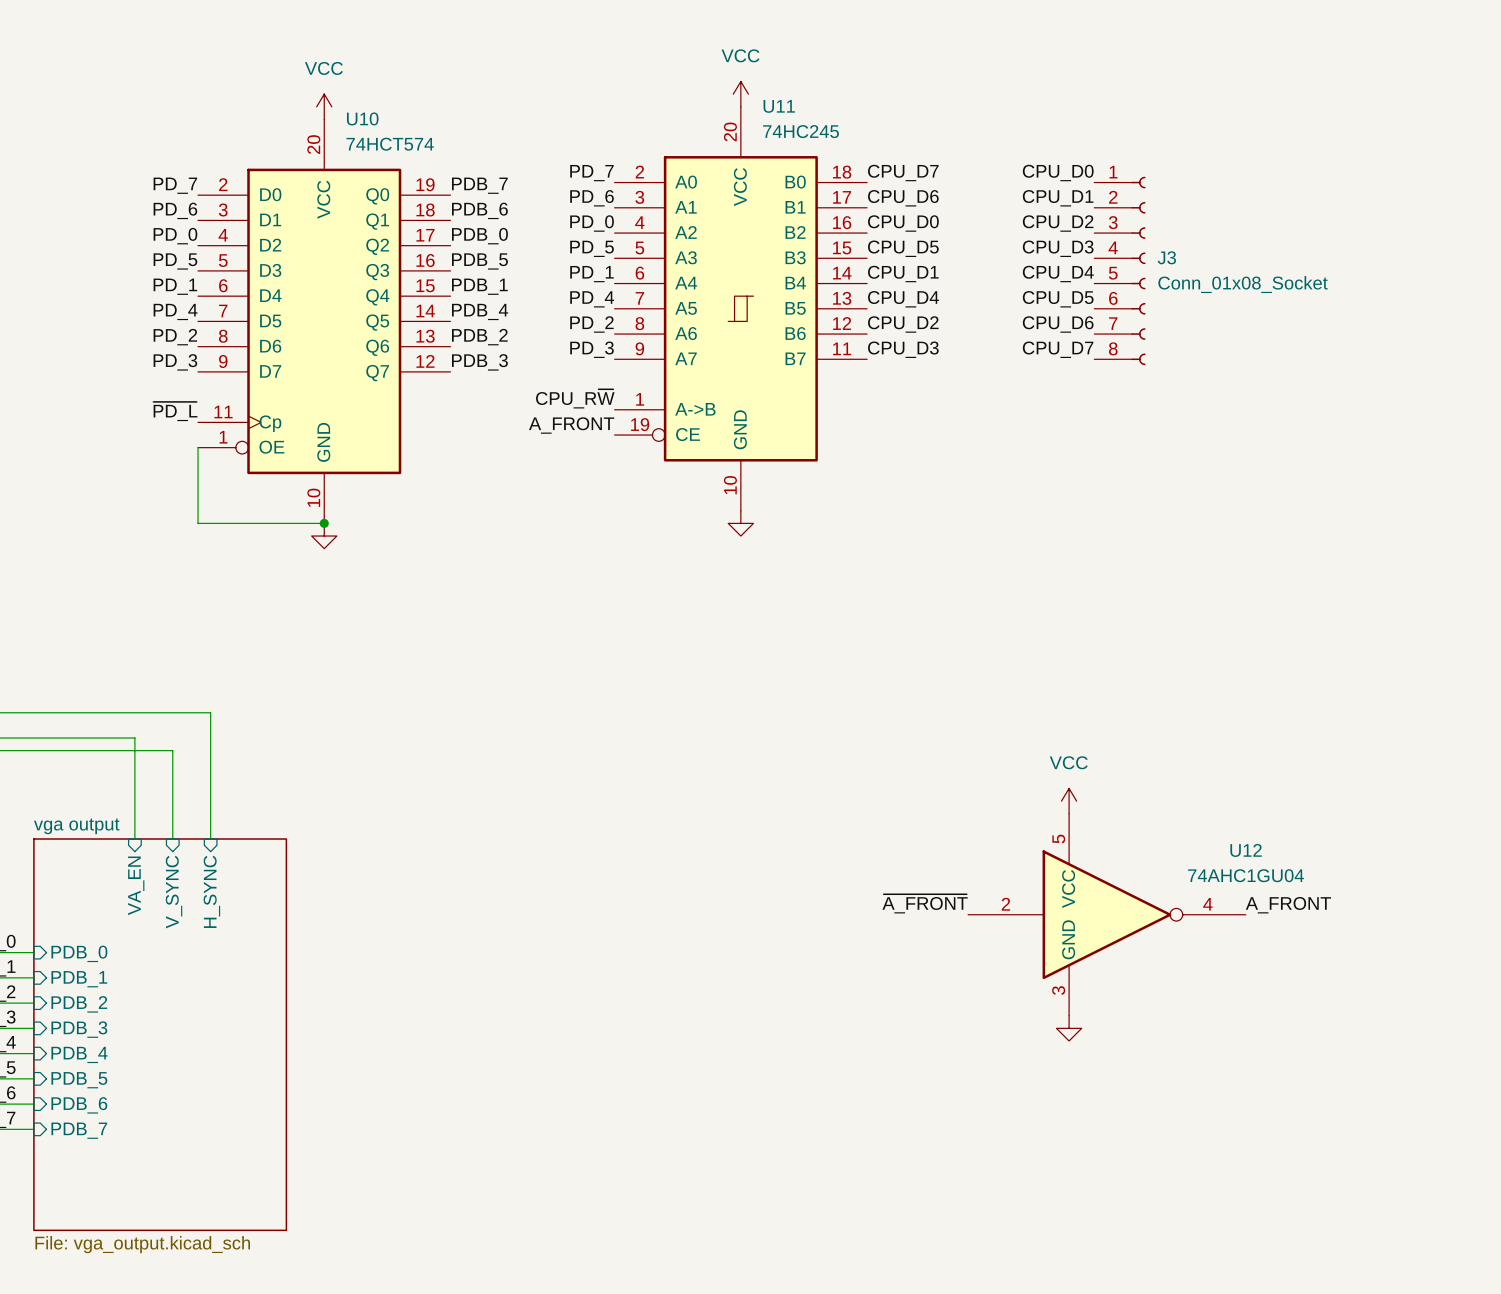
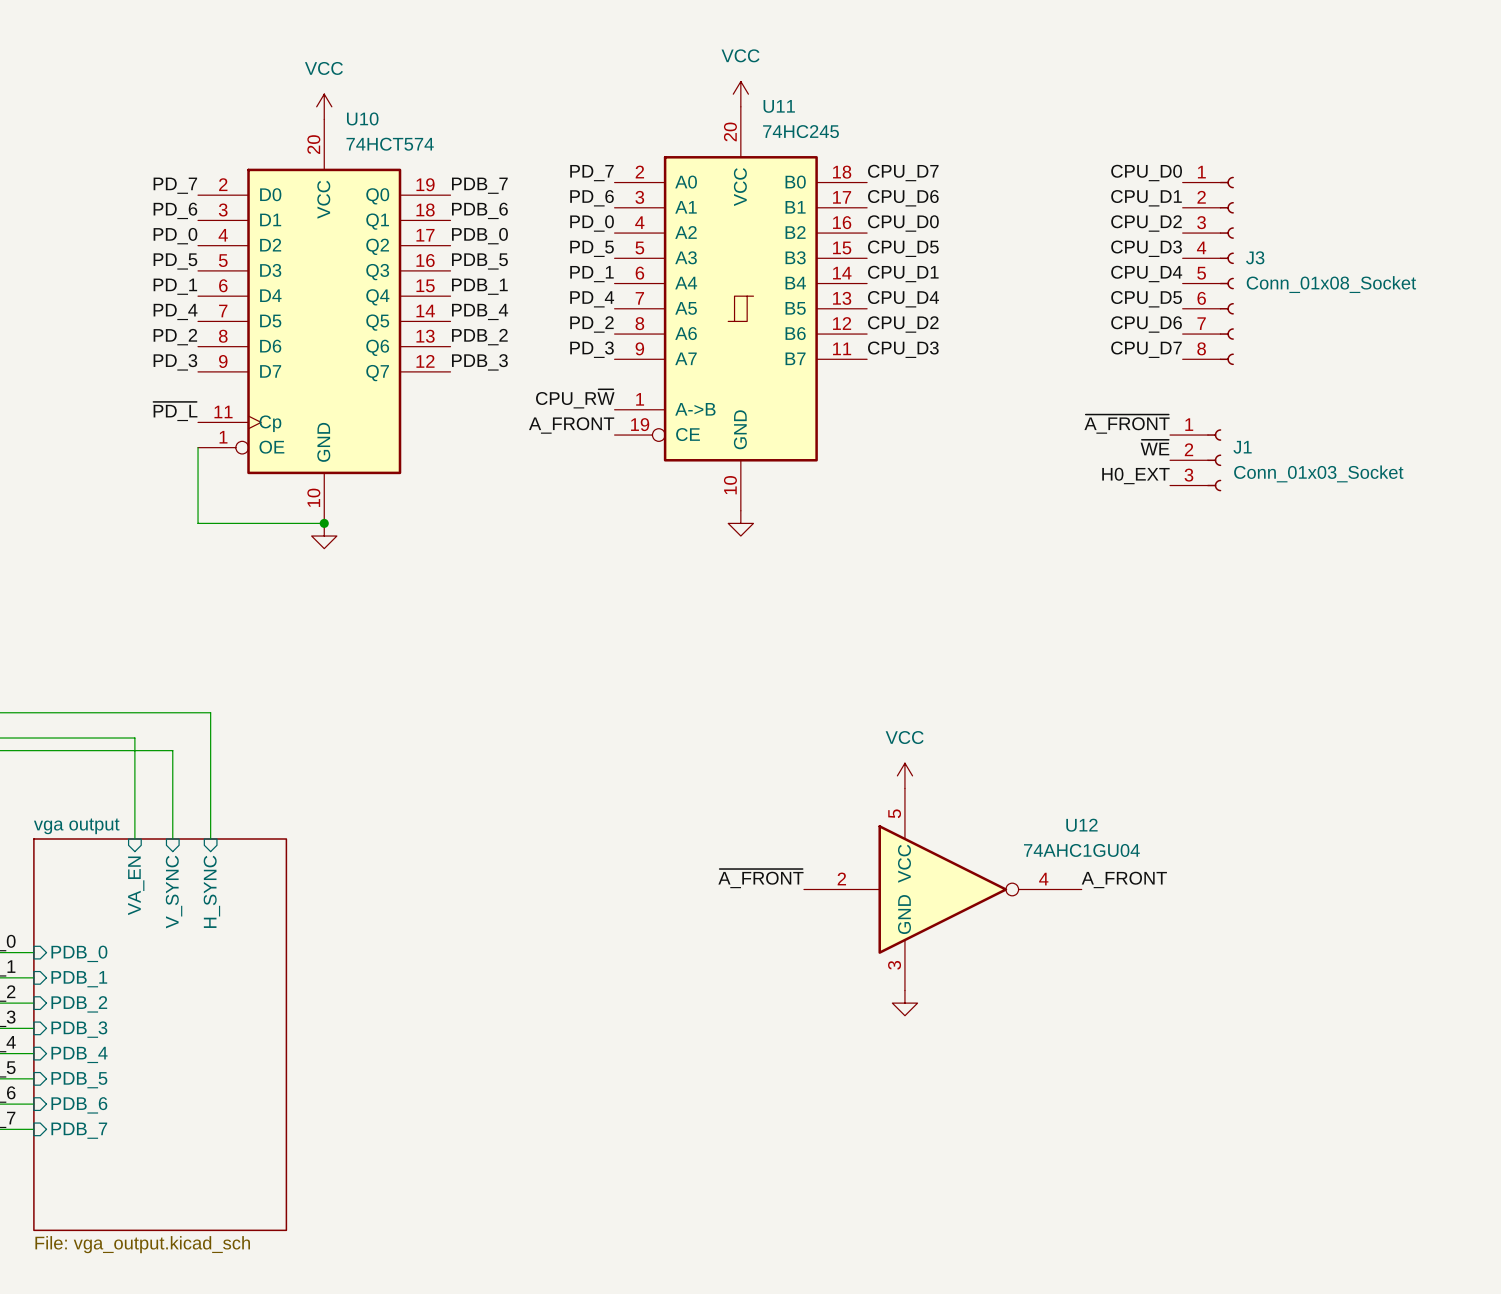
label position: CPU_D0 (1058, 173) -> CPU_D0 (1146, 173)
label position: CPU_D1 (1058, 198) -> CPU_D1 (1146, 198)
label position: CPU_D2 (1058, 223) -> CPU_D2 (1146, 223)
label position: CPU_D3 (1058, 248) -> CPU_D3 (1146, 248)
J3 position: (1119, 270) -> (1208, 270)
label position: CPU_D4 (1058, 274) -> CPU_D4 (1146, 274)
label position: CPU_D5 (1058, 299) -> CPU_D5 (1146, 299)
label position: CPU_D6 (1058, 324) -> CPU_D6 (1146, 324)
label position: CPU_D7 (1058, 349) -> CPU_D7 (1146, 349)
label: none -> ~{A_FRONT} (1127, 424)
label: none -> ~{WE} (1154, 447)
J1: none -> Conn_01x03_Socket (1195, 460)
label: none -> H0_EXT (1135, 475)
power symbol position: VCC (1069, 801) -> VCC (904, 775)
label position: ~{A_FRONT} (925, 903) -> ~{A_FRONT} (760, 878)
label position: A_FRONT (1288, 905) -> A_FRONT (1124, 879)
U12 position: (1106, 914) -> (942, 889)
power symbol position: (1069, 1028) -> (904, 1003)

